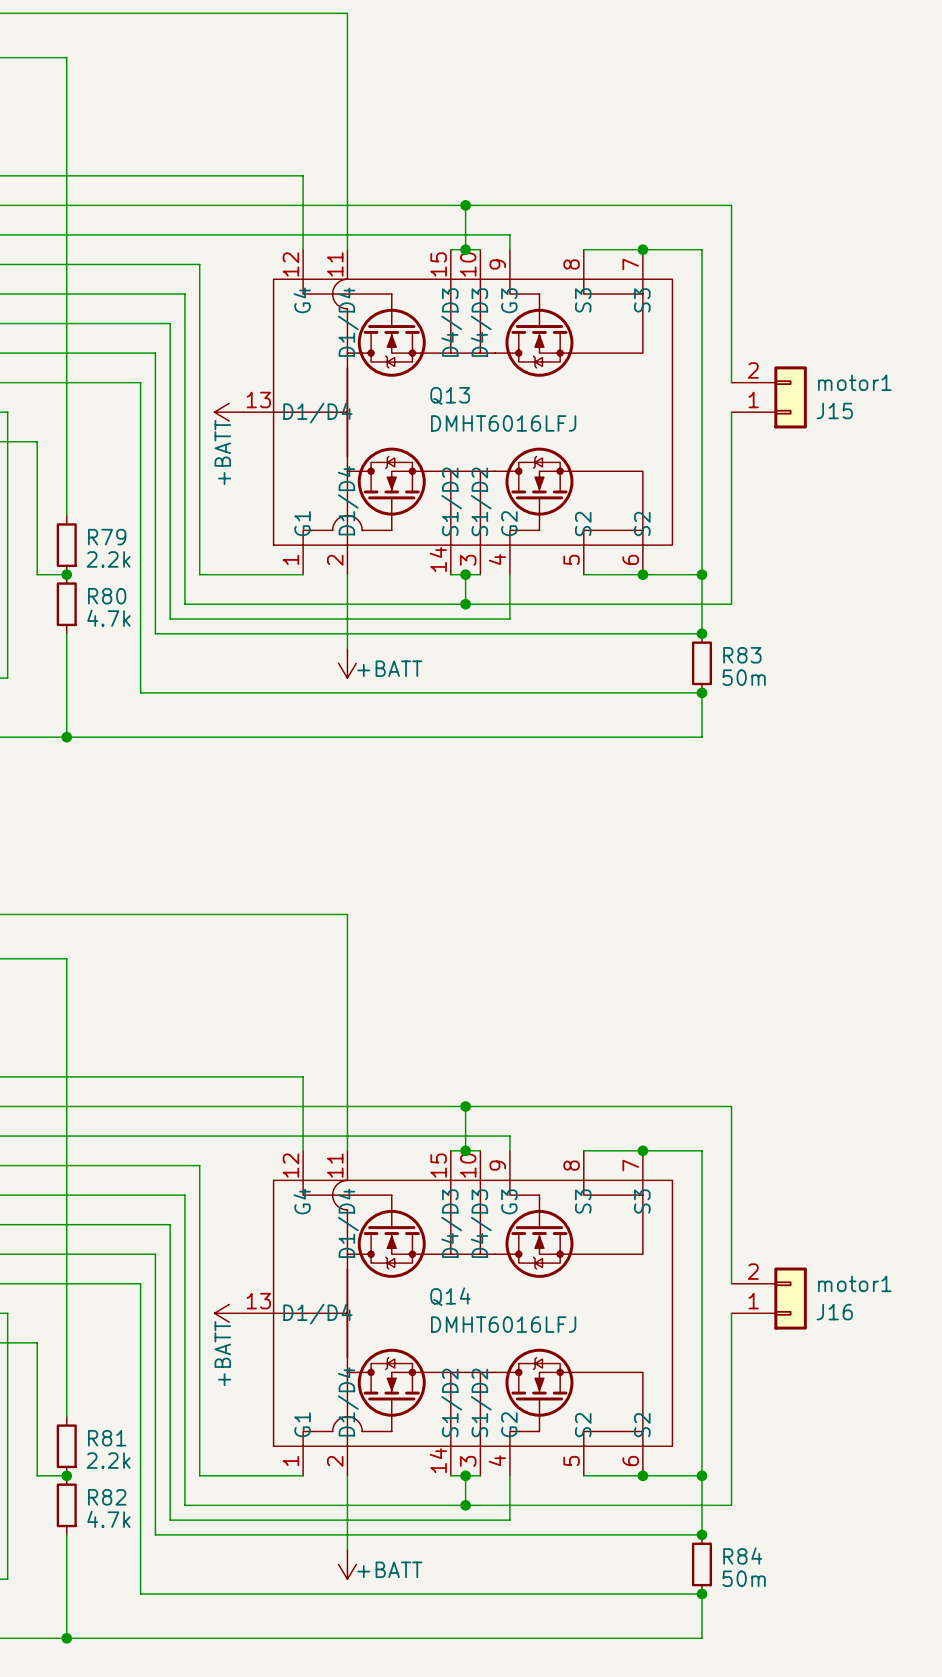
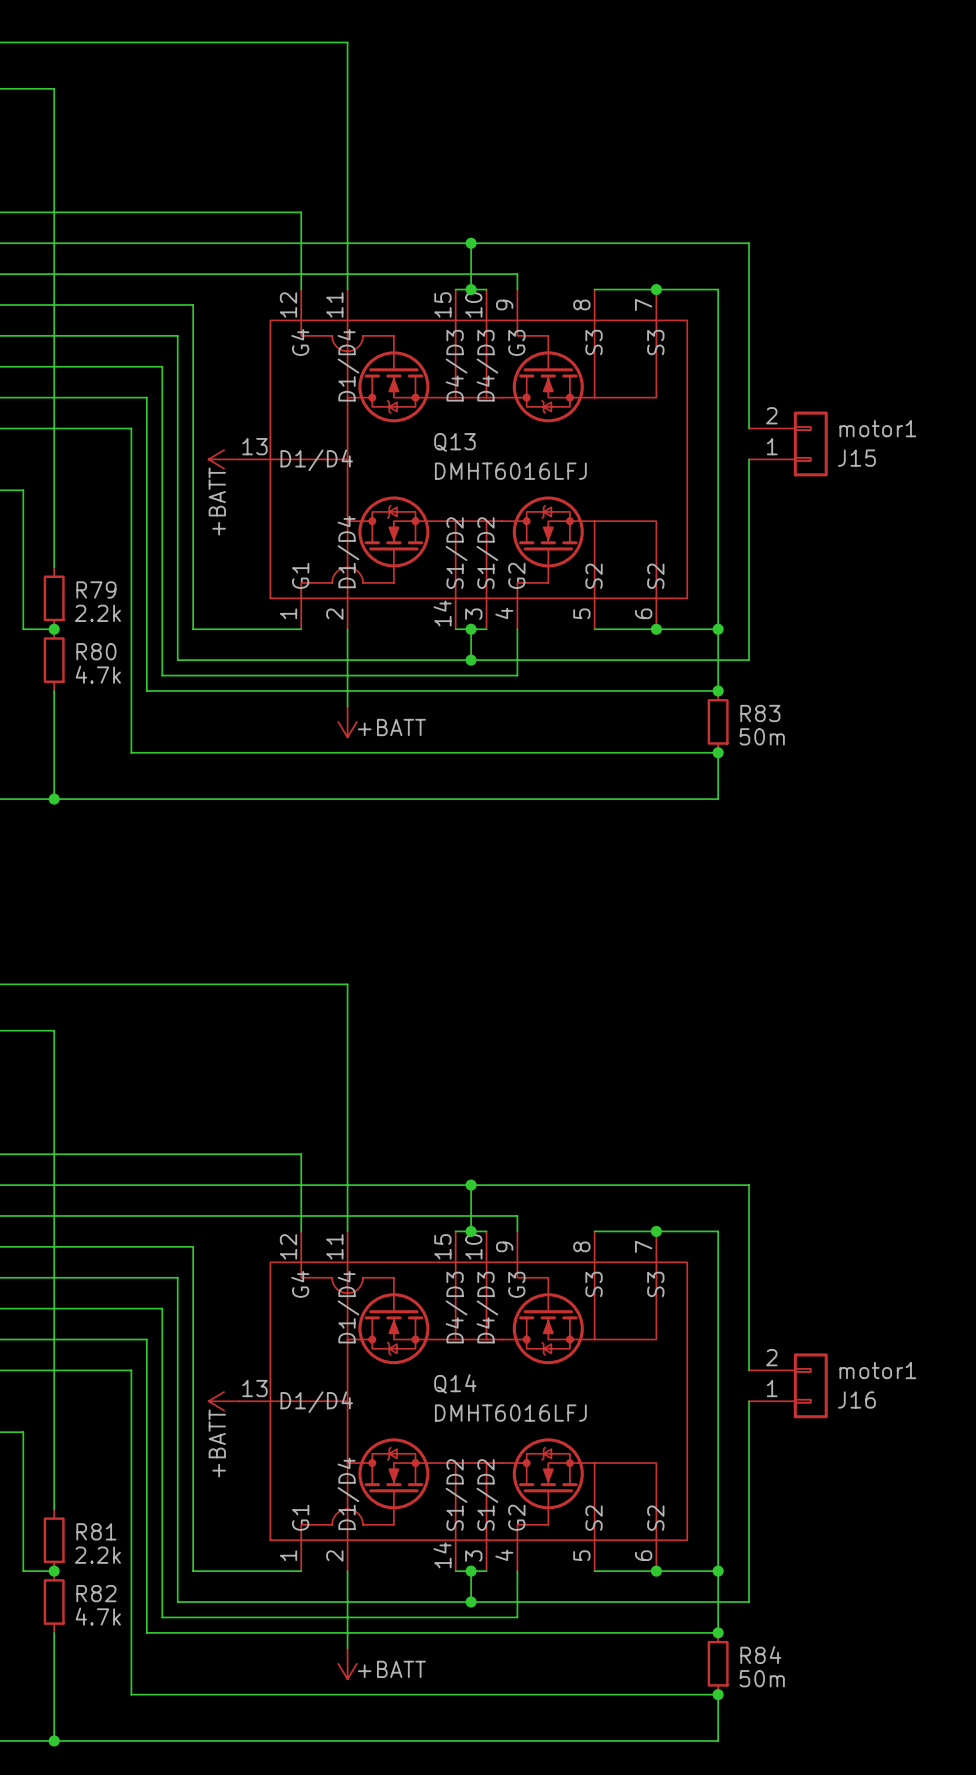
Q13 symbol: [244, 249, 673, 575] -> [239, 289, 688, 630]
Q14 symbol: [244, 1150, 673, 1476] -> [239, 1231, 688, 1572]

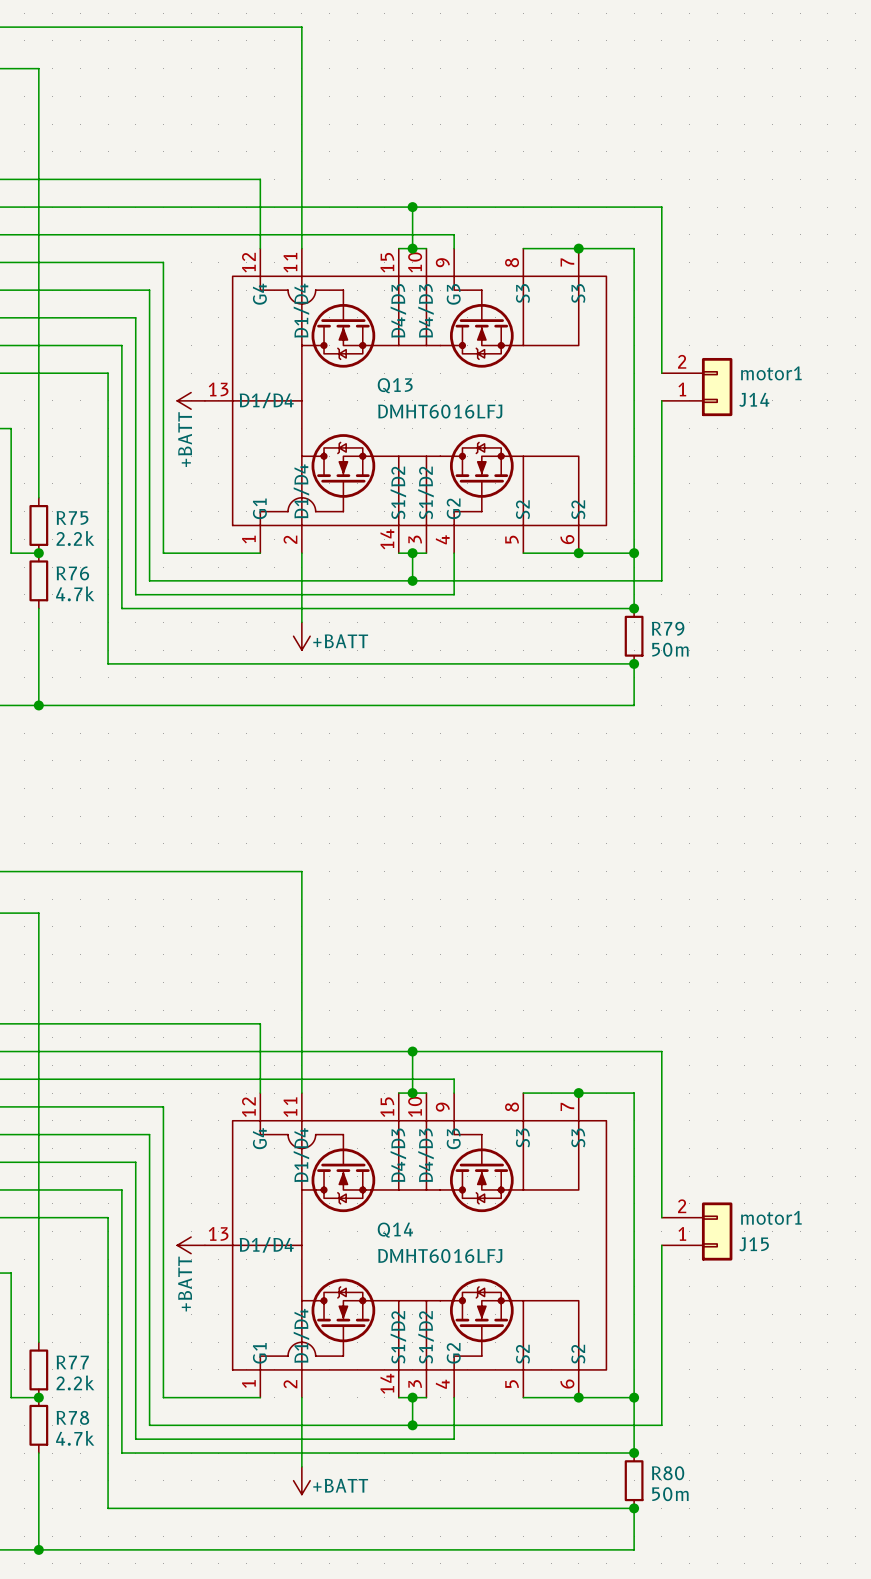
J15 name: J15 (856, 458) -> J14 (754, 399)
R79 name: R79 (96, 589) -> R75 (72, 517)
R80 name: R80 (96, 651) -> R76 (72, 573)
R83 name: R83 (760, 713) -> R79 (668, 628)
J16 name: J16 (856, 1399) -> J15 (754, 1244)
R81 name: R81 (96, 1531) -> R77 (72, 1362)
R82 name: R82 (96, 1593) -> R78 (72, 1417)
R84 name: R84 (760, 1654) -> R80 (668, 1473)

